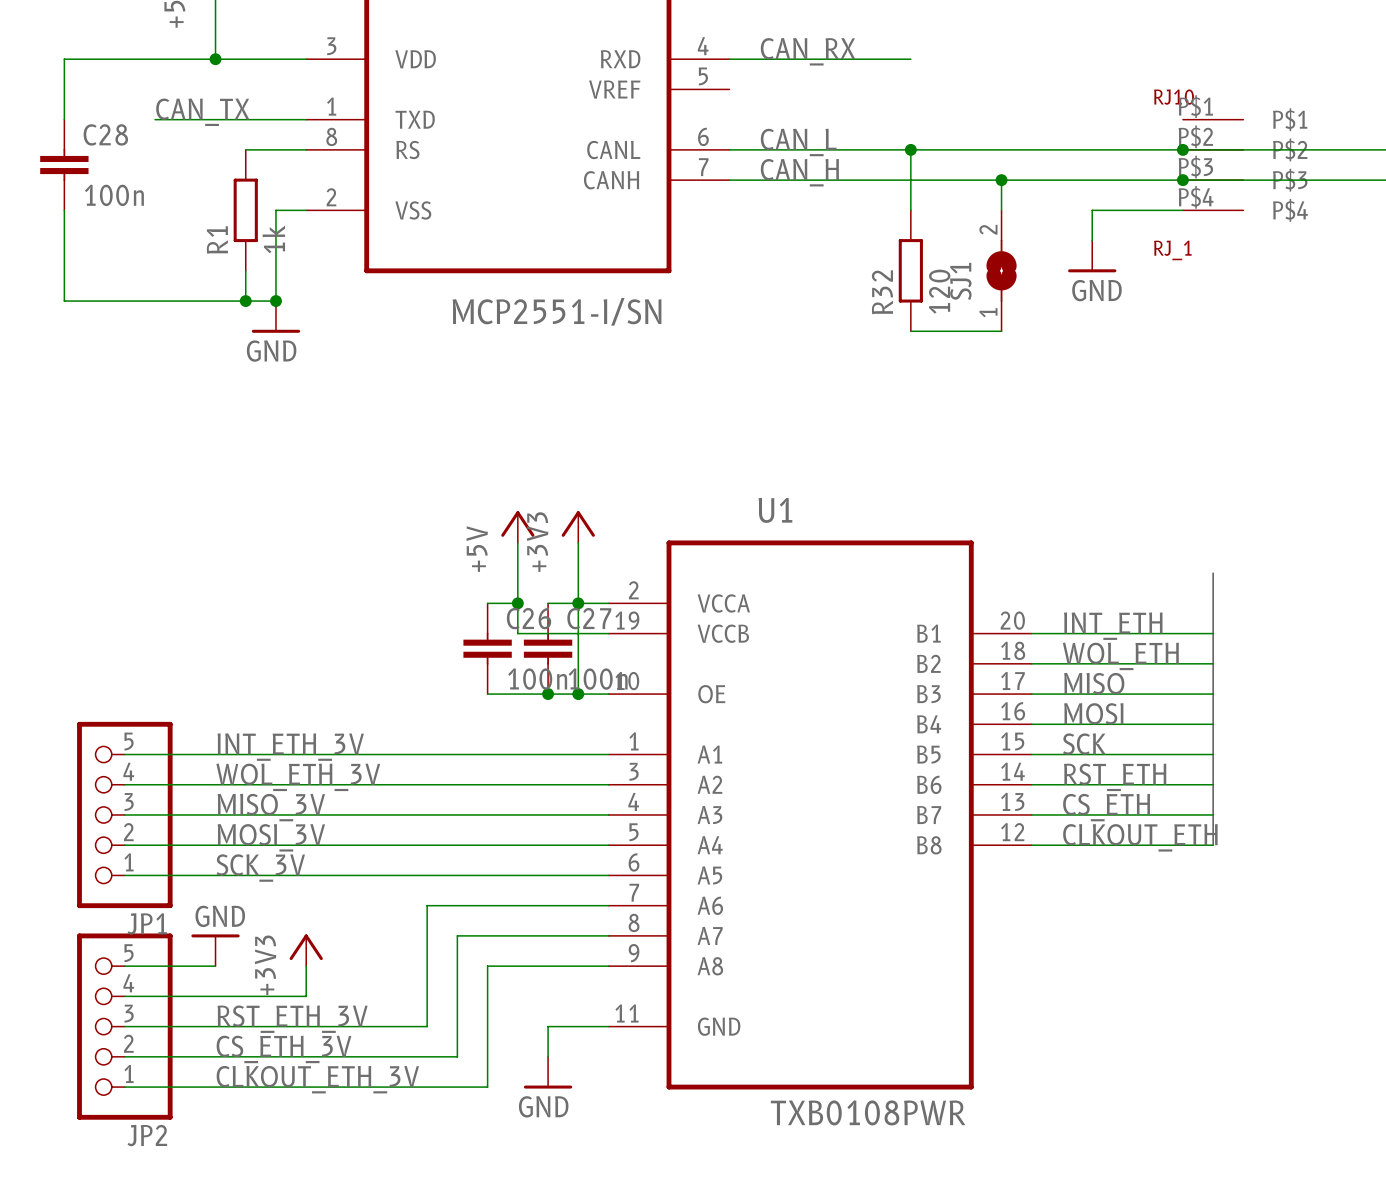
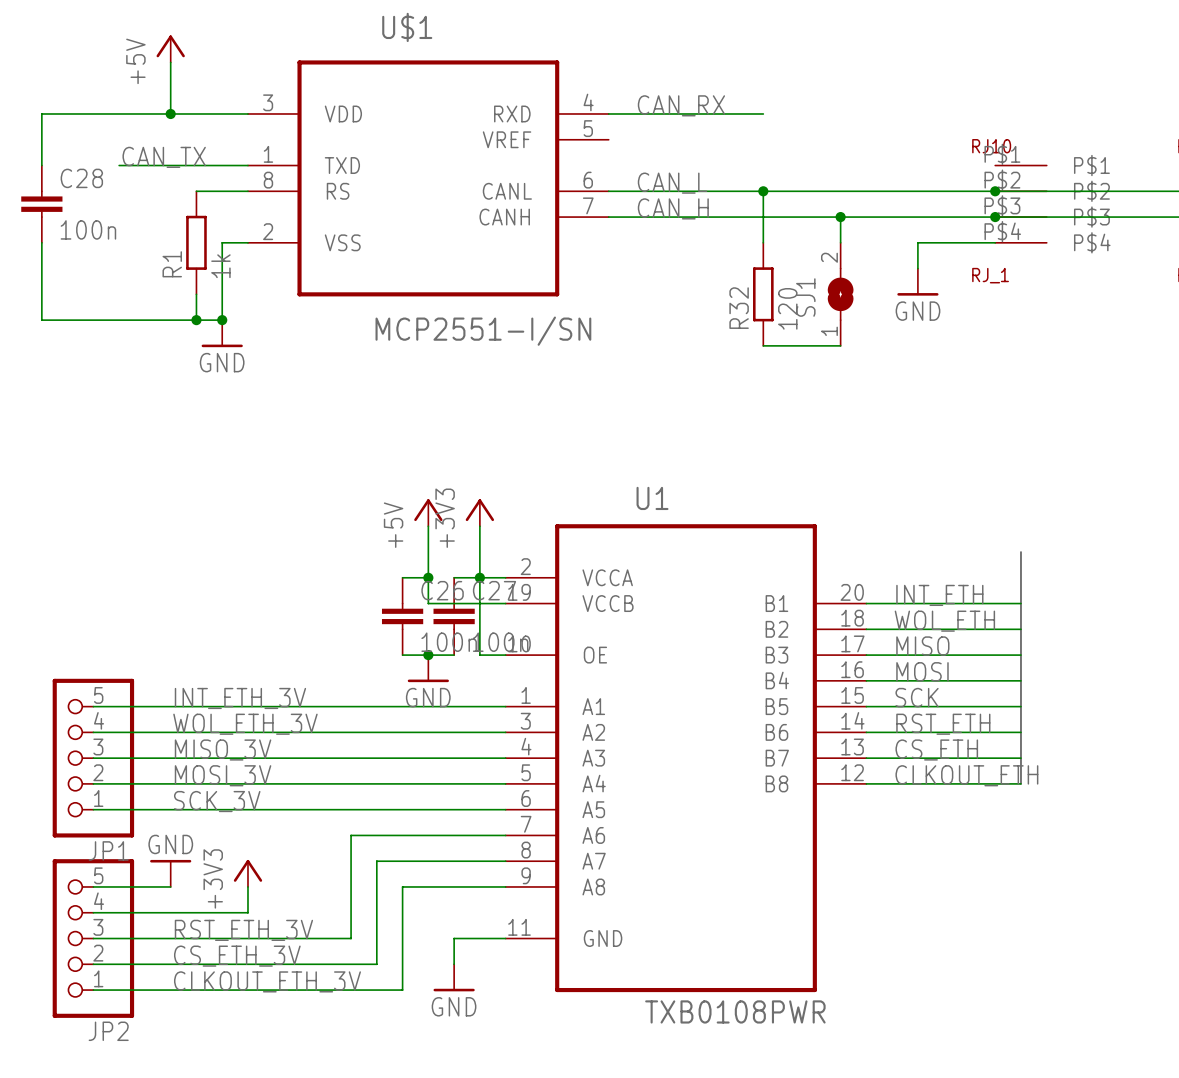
junction: none -> (428, 655)
wire: (548, 694) (578, 694) -> none
junction: (548, 694) -> none
junction: (578, 694) -> none
power symbol: none -> GND (428, 668)

